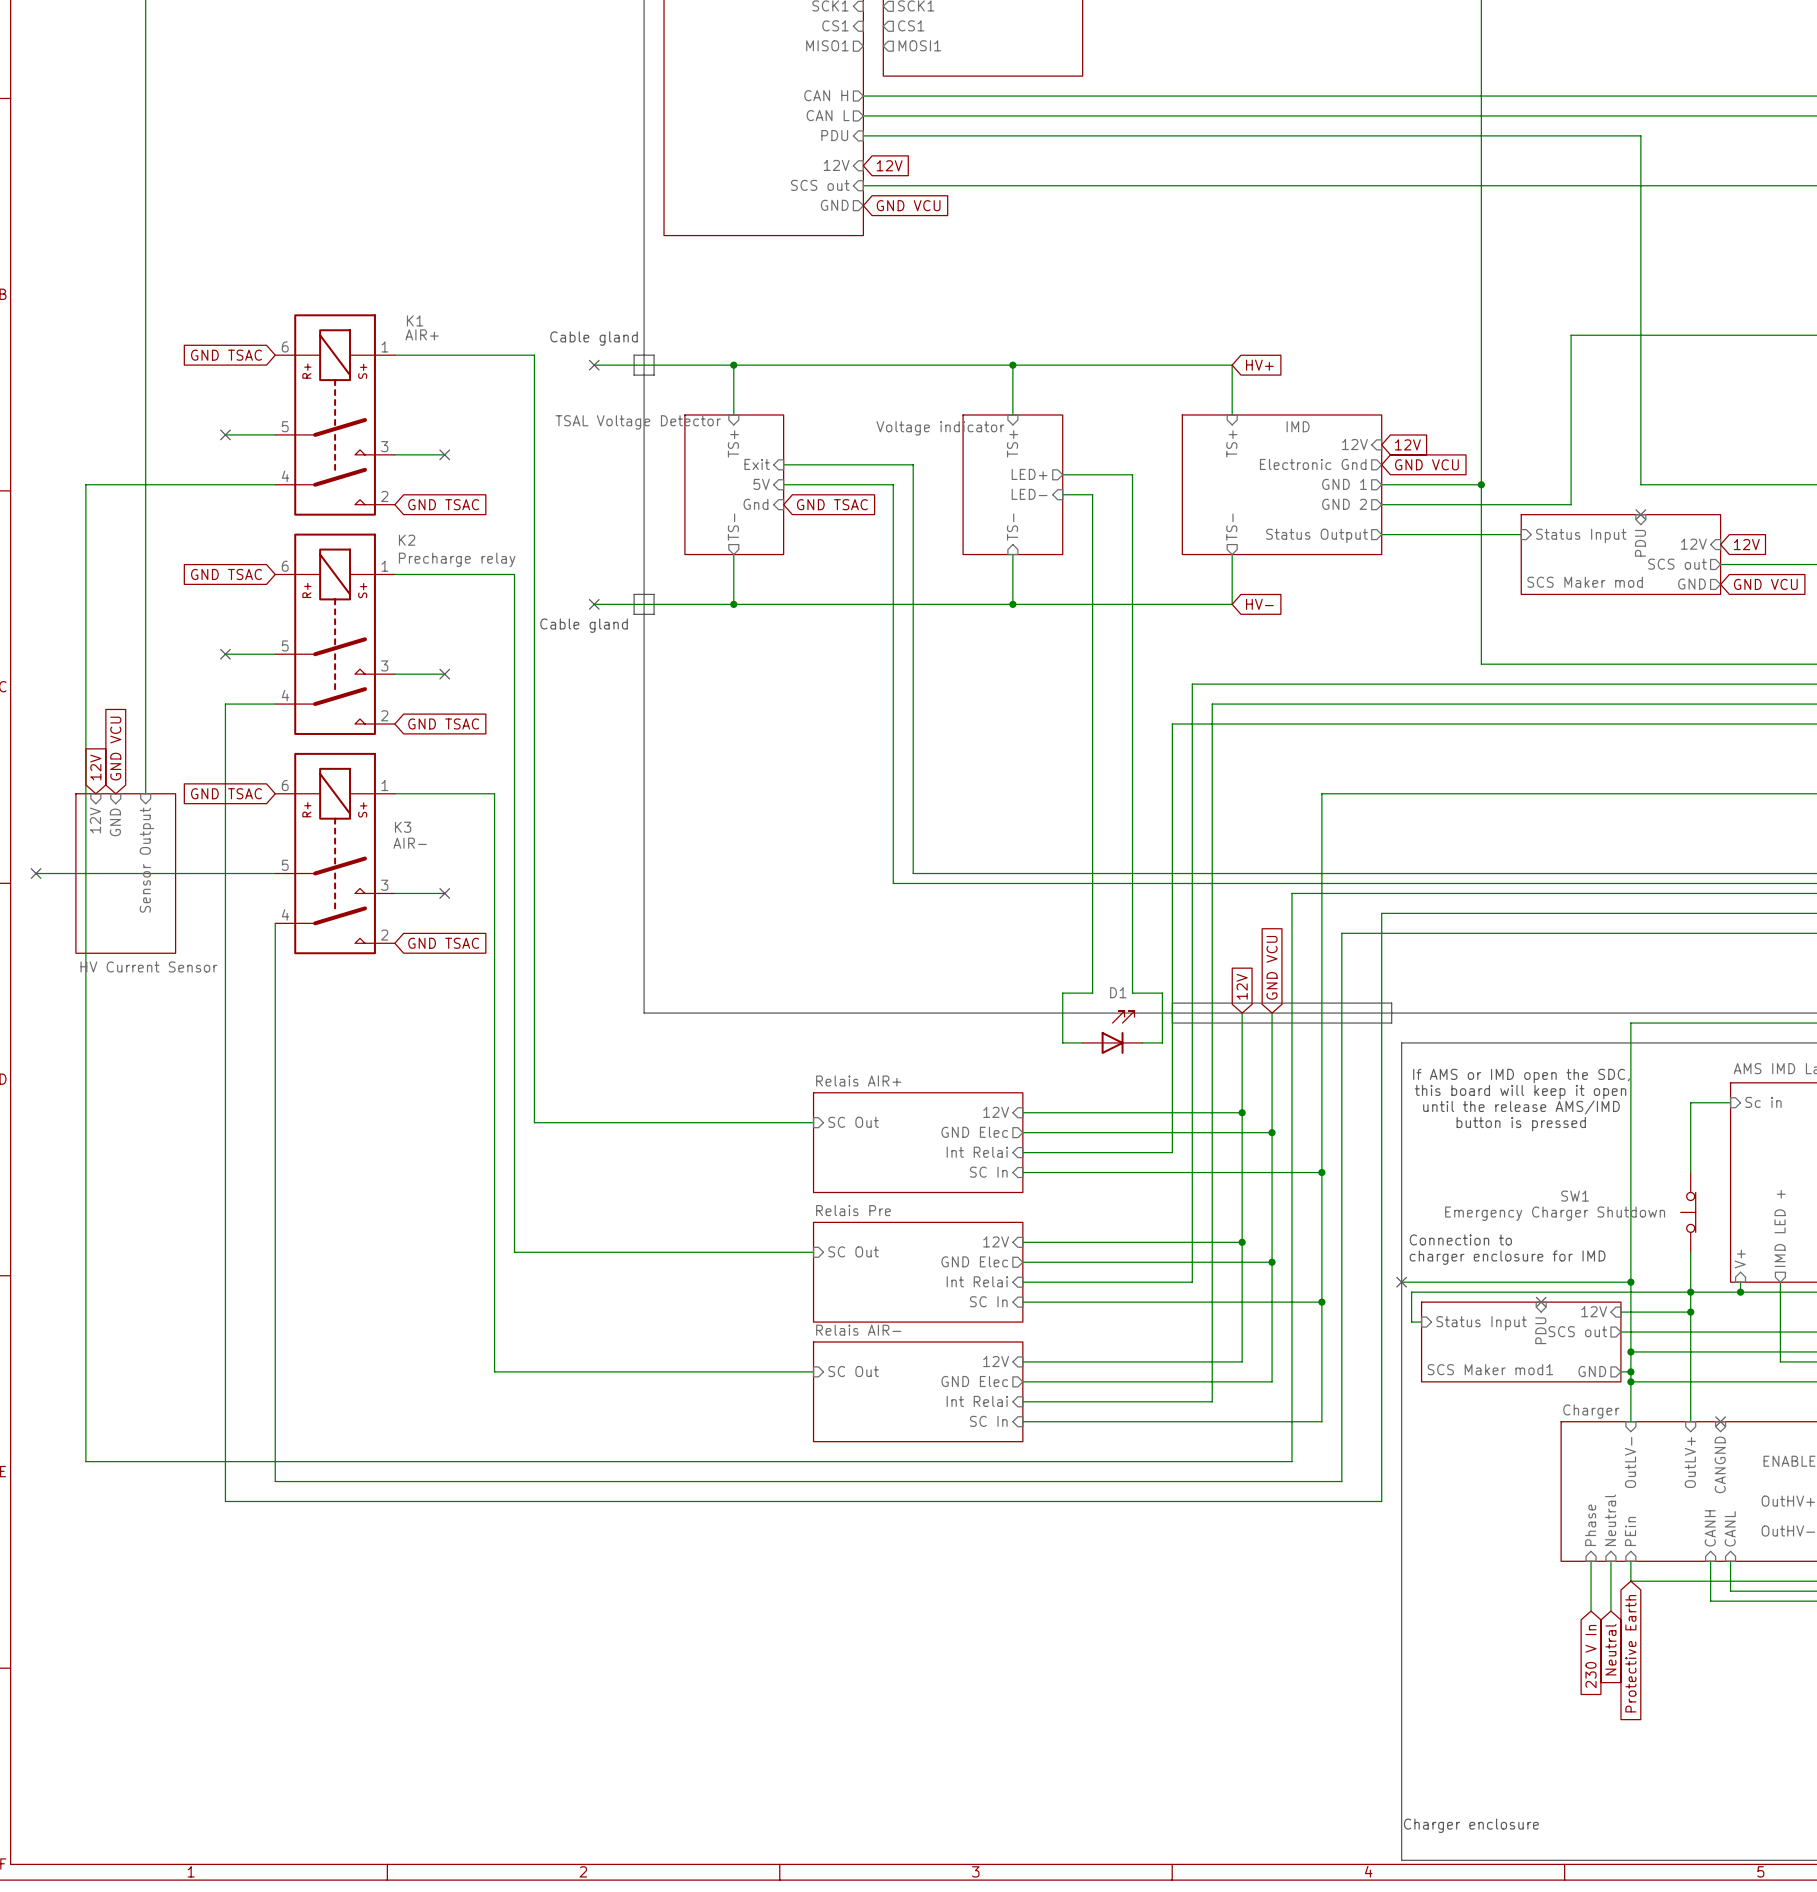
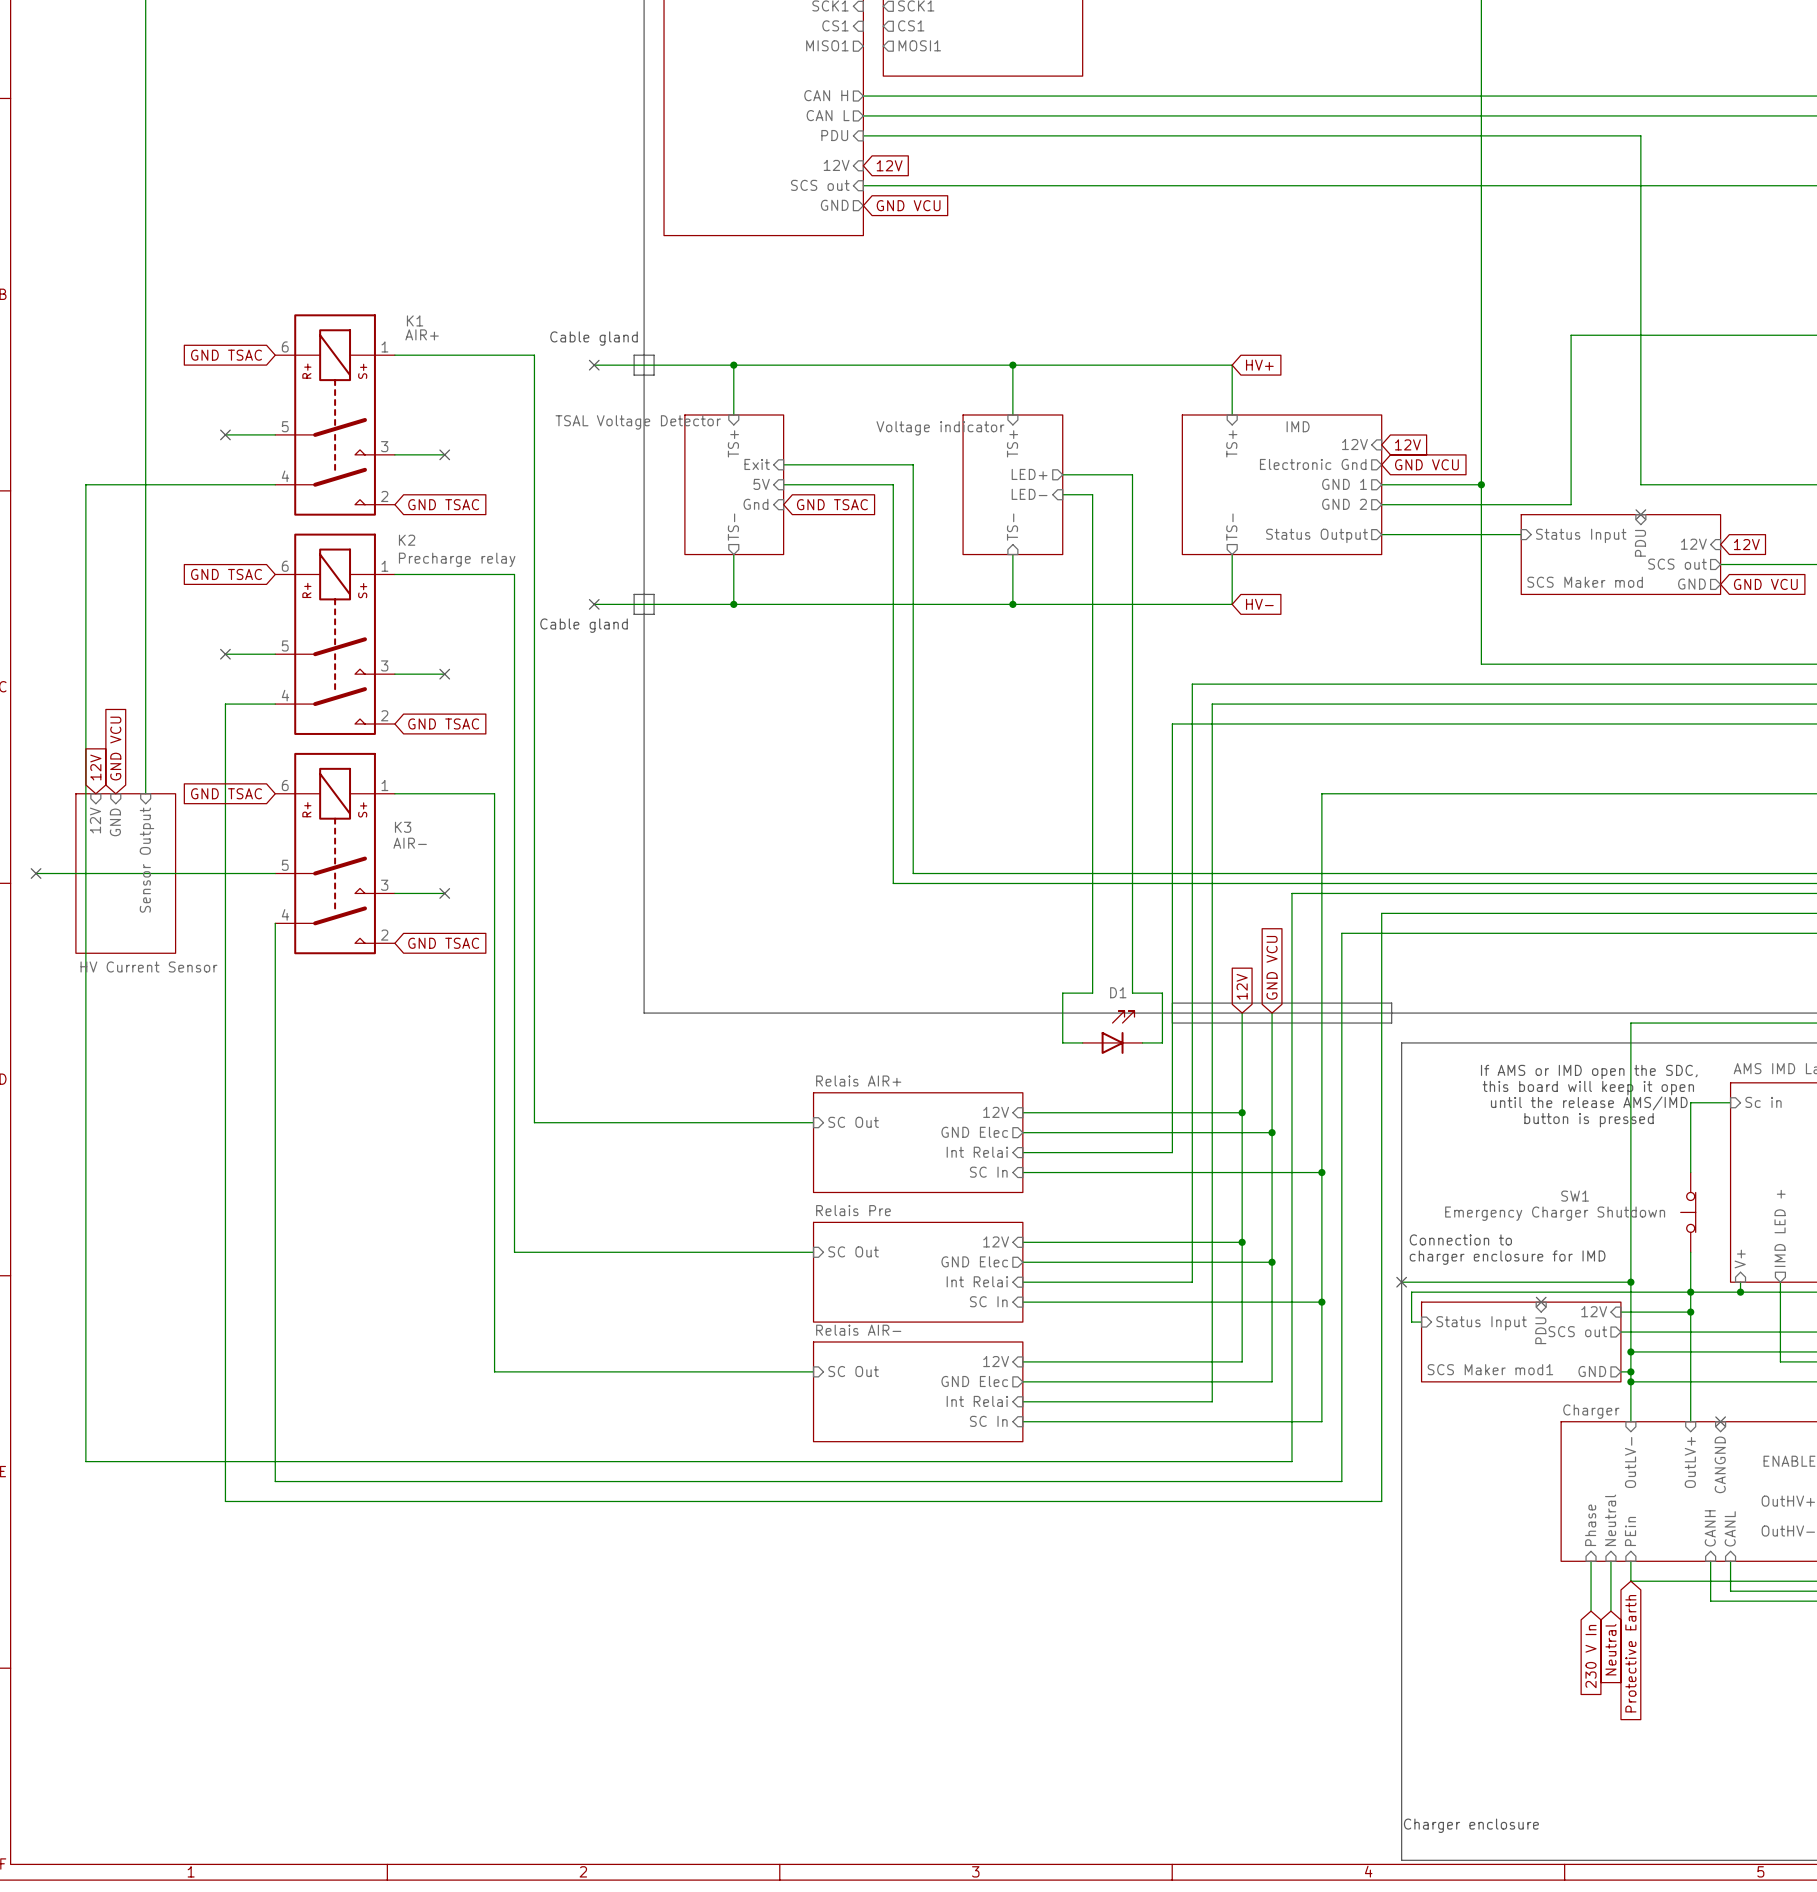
text position: If AMS or IMD open the SDC, (1521, 1076) -> If AMS or IMD open the SDC, (1589, 1072)
text position: this board will keep it open (1520, 1092) -> this board will keep it open (1588, 1088)
text position: until the release AMS/IMD (1521, 1107) -> until the release AMS/IMD (1589, 1103)
text position: button is pressed (1521, 1124) -> button is pressed (1589, 1120)

